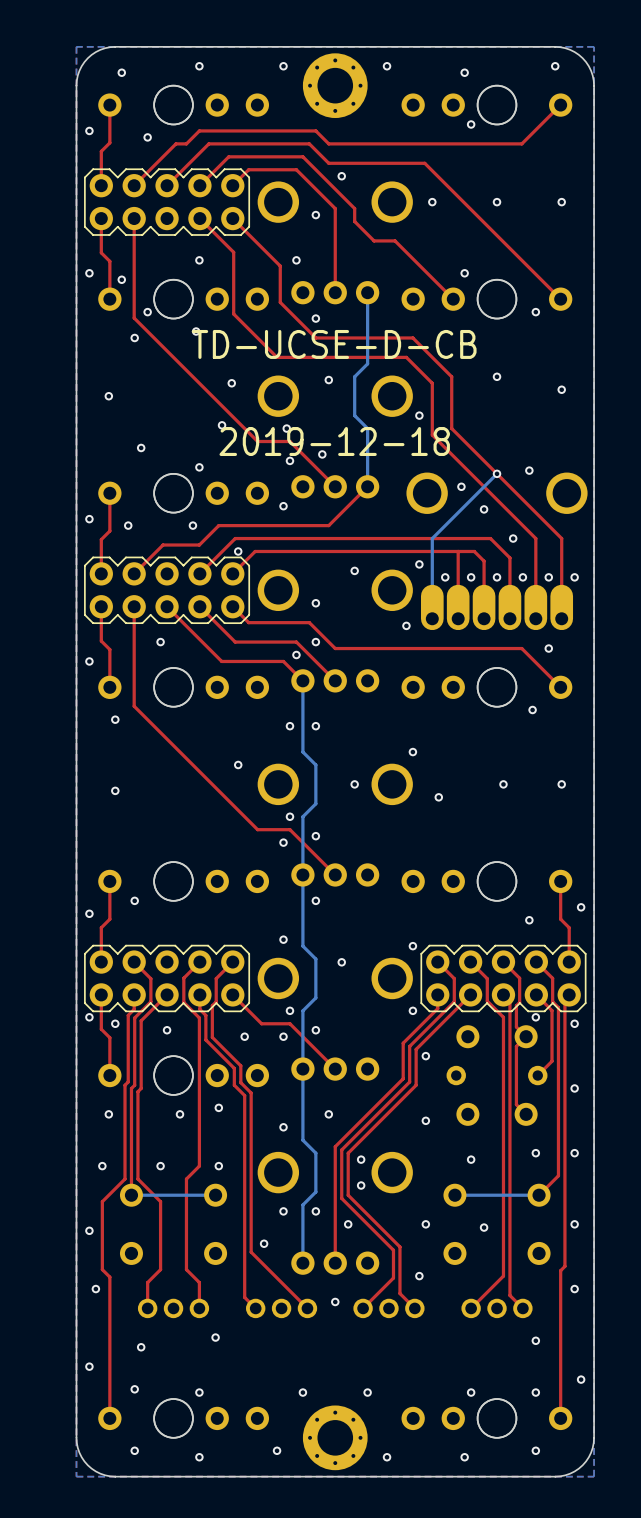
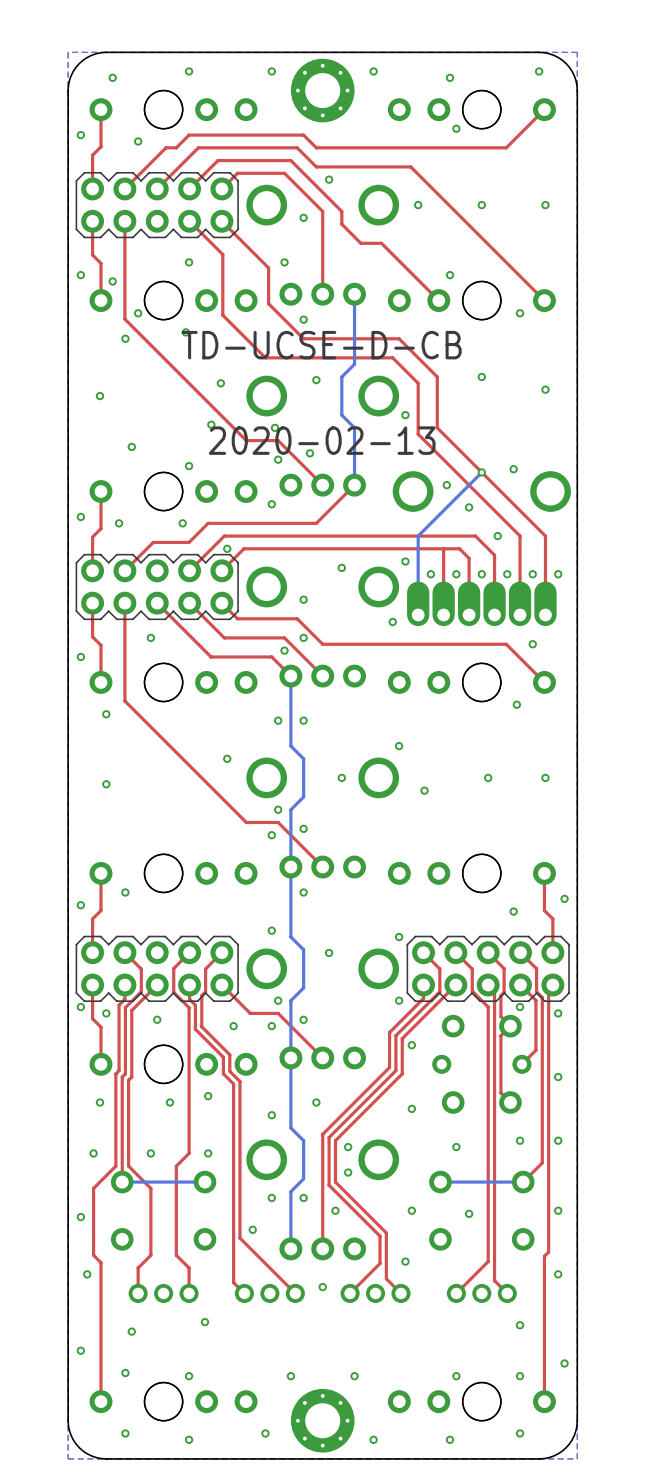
text: 2019-12-18 (334, 441) -> 2020-02-13 (322, 440)

